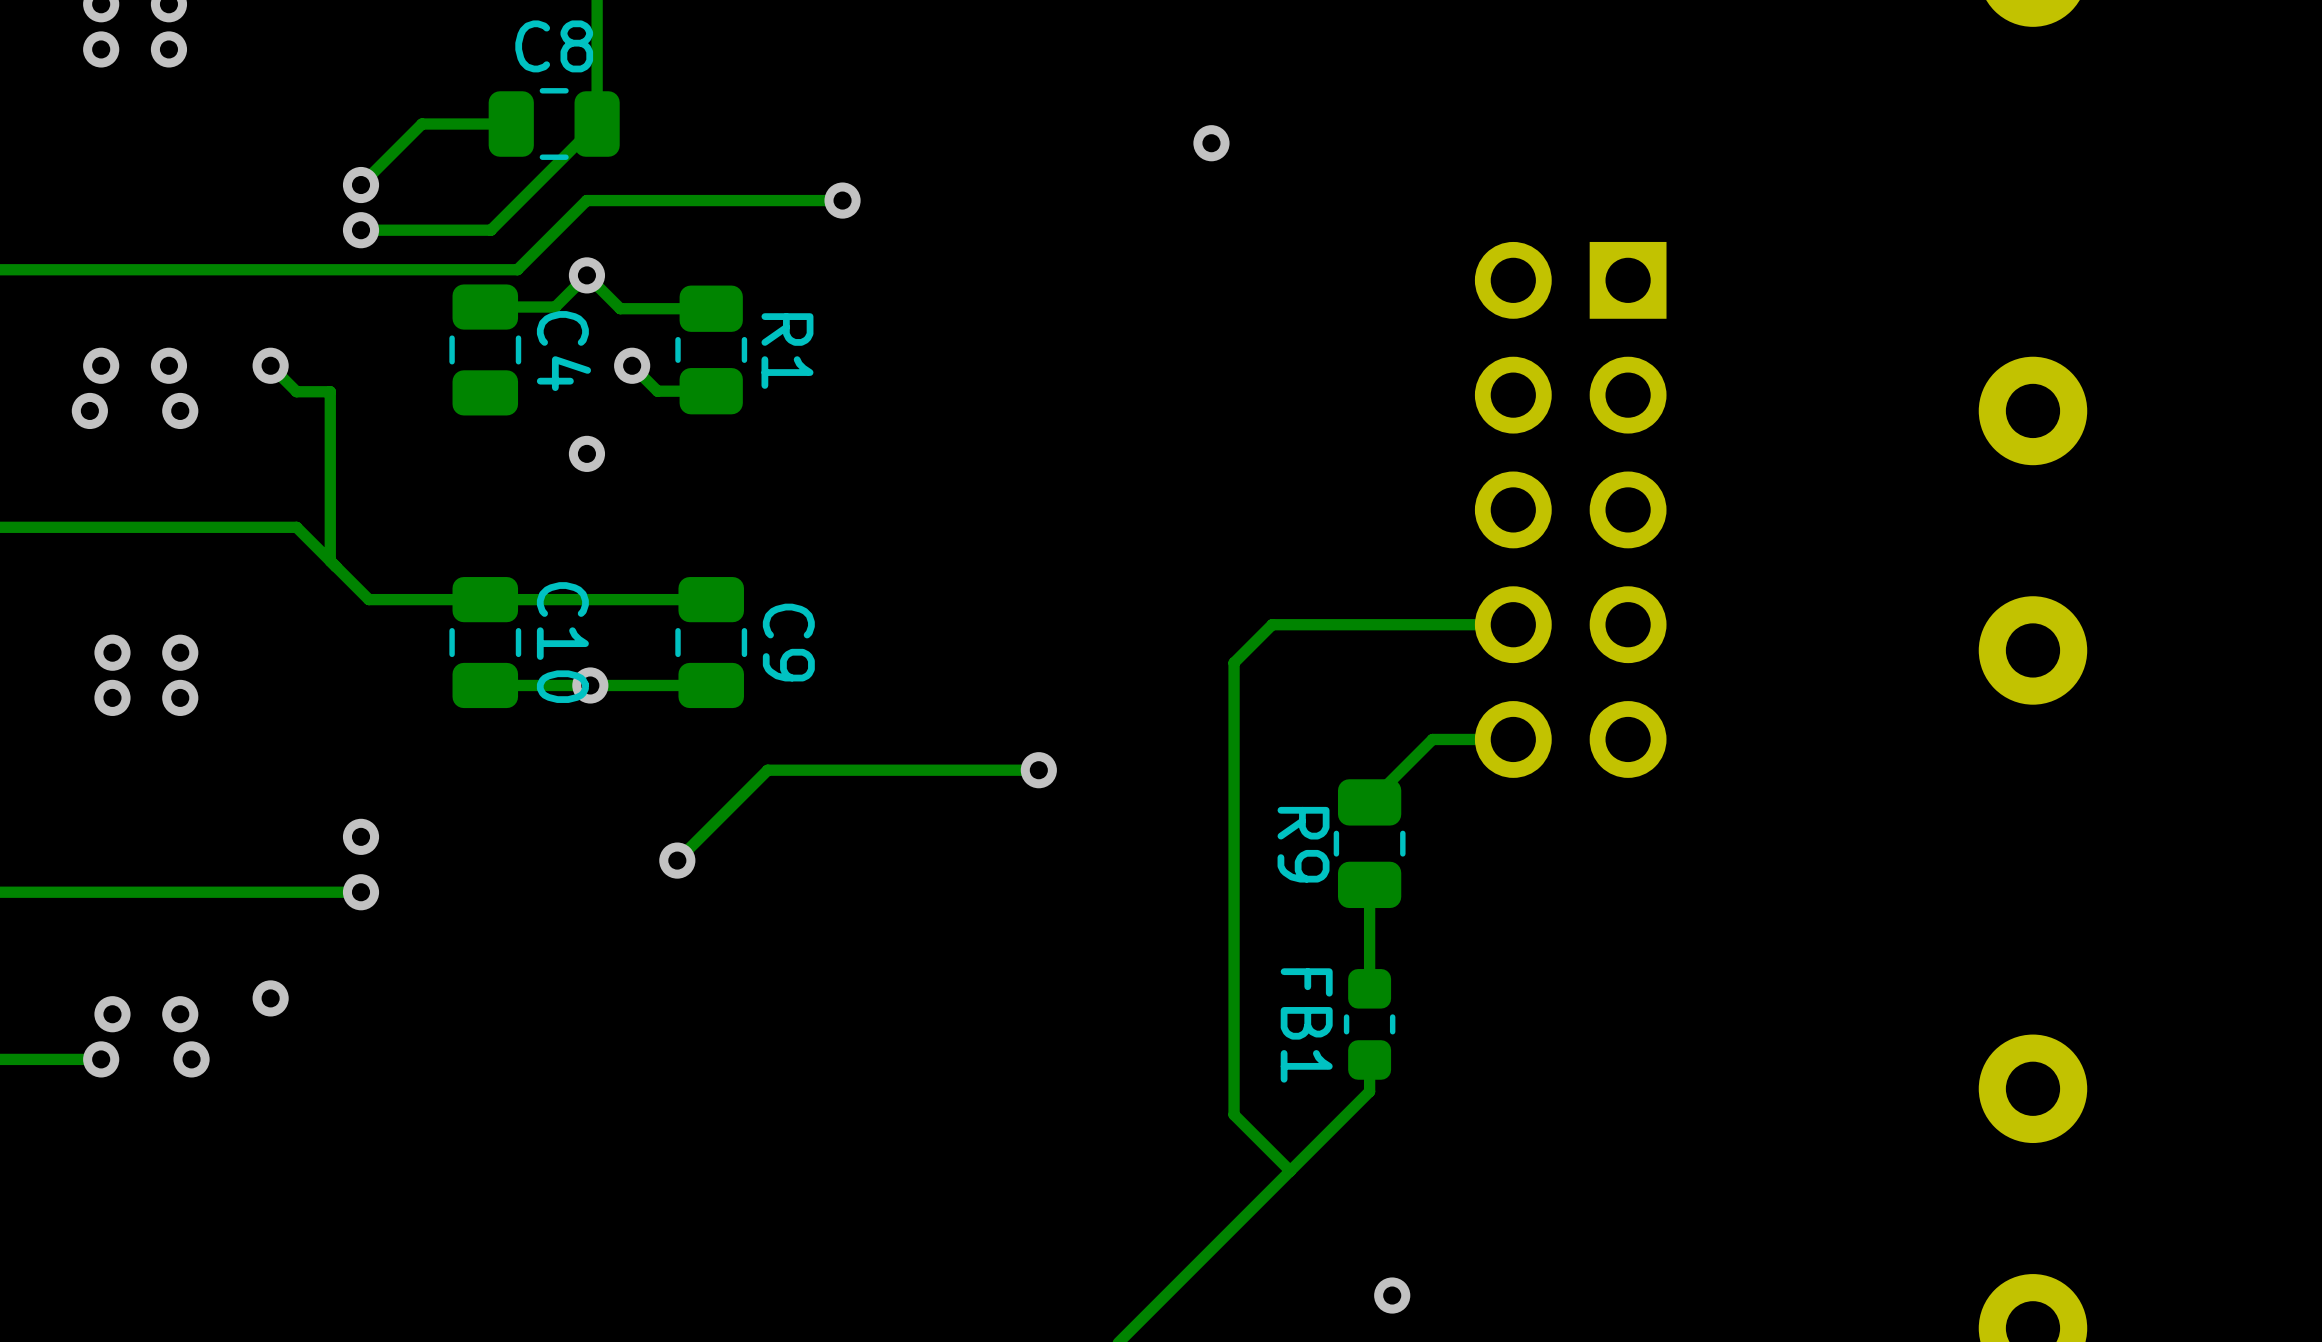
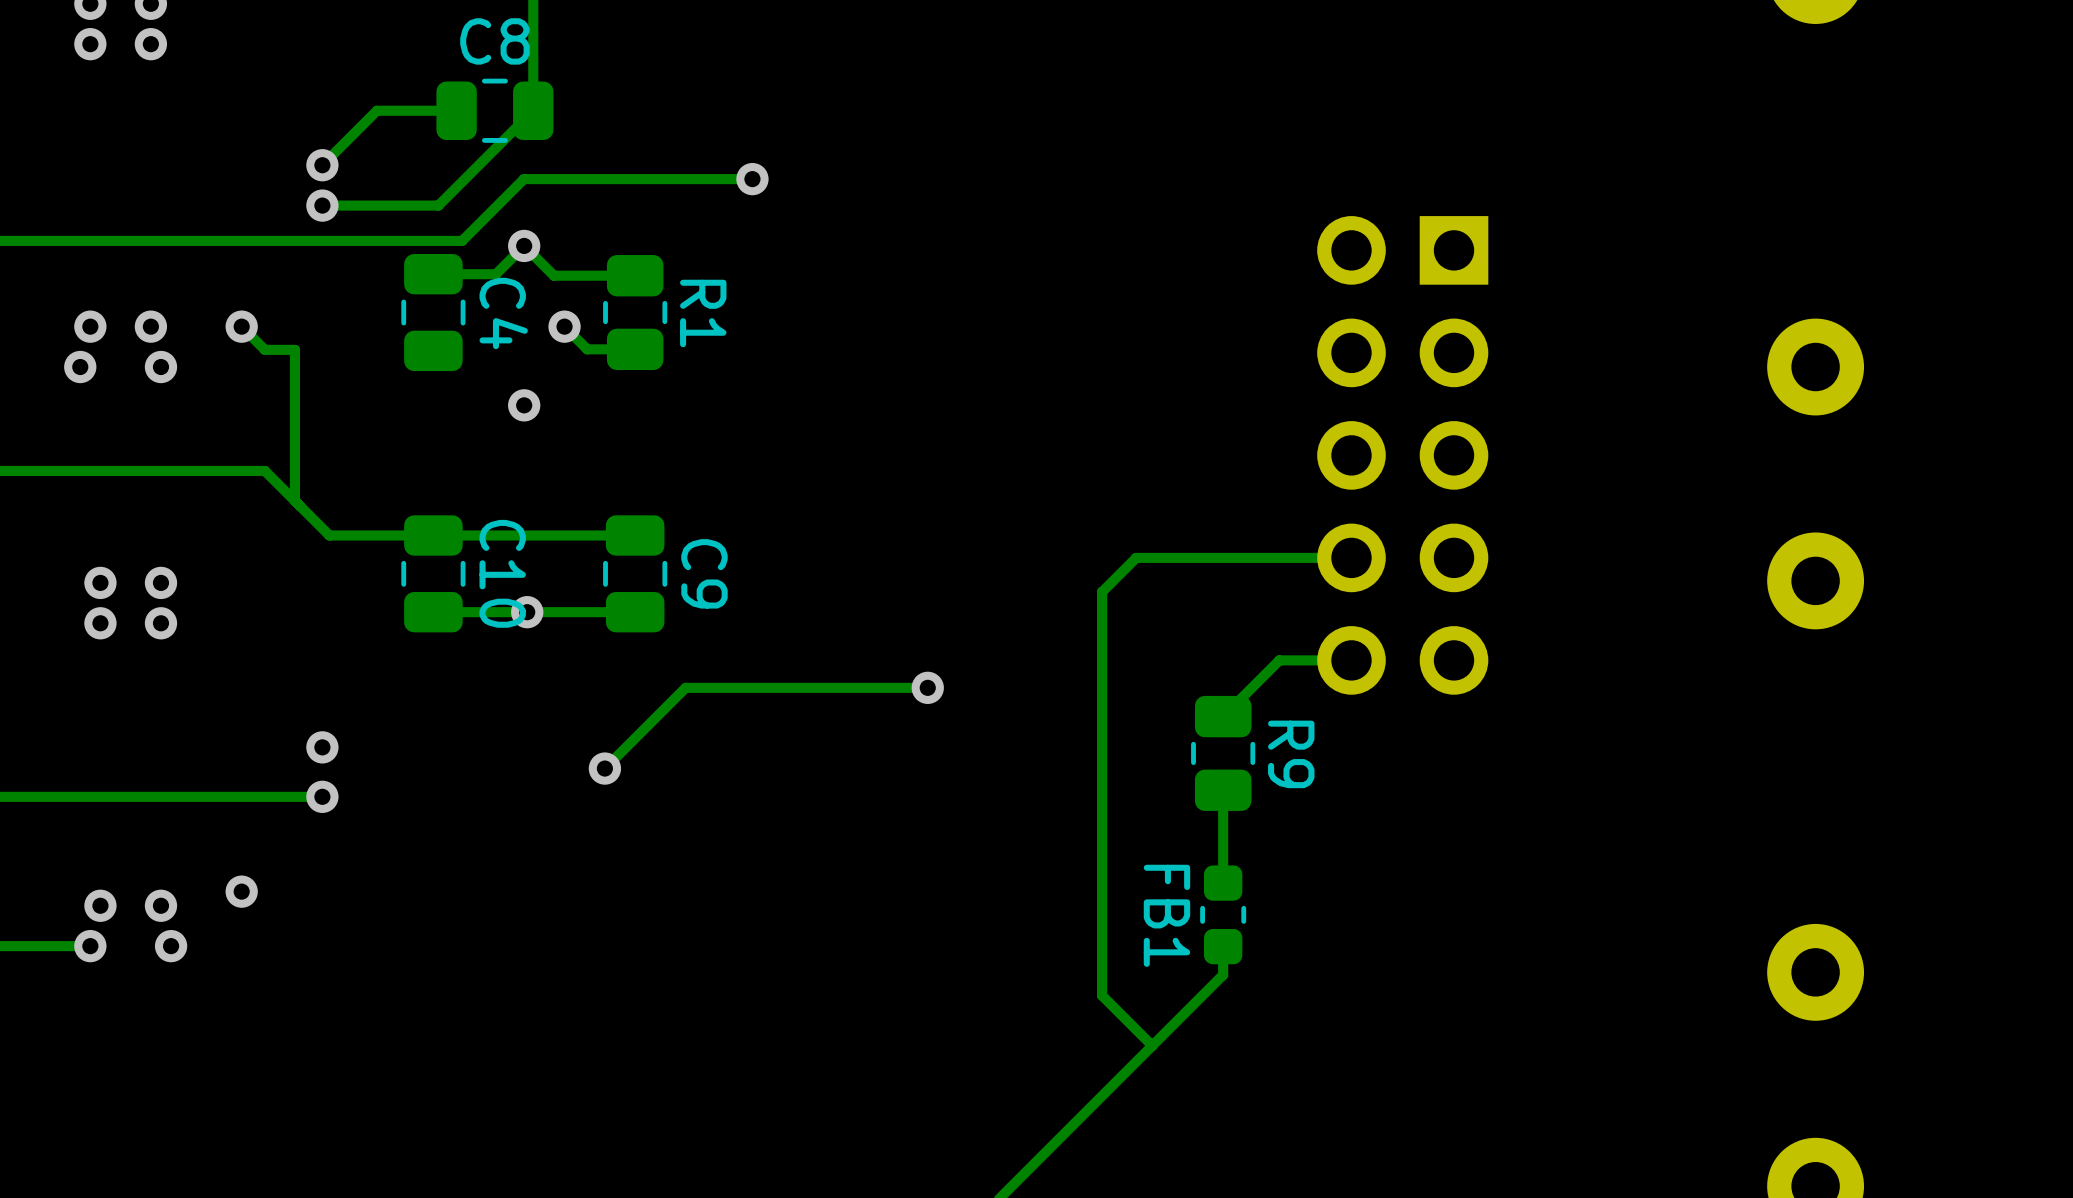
via: (1211, 143) -> none
R9 name position: R9 (1303, 844) -> R9 (1291, 754)
via: (1392, 1295) -> none

